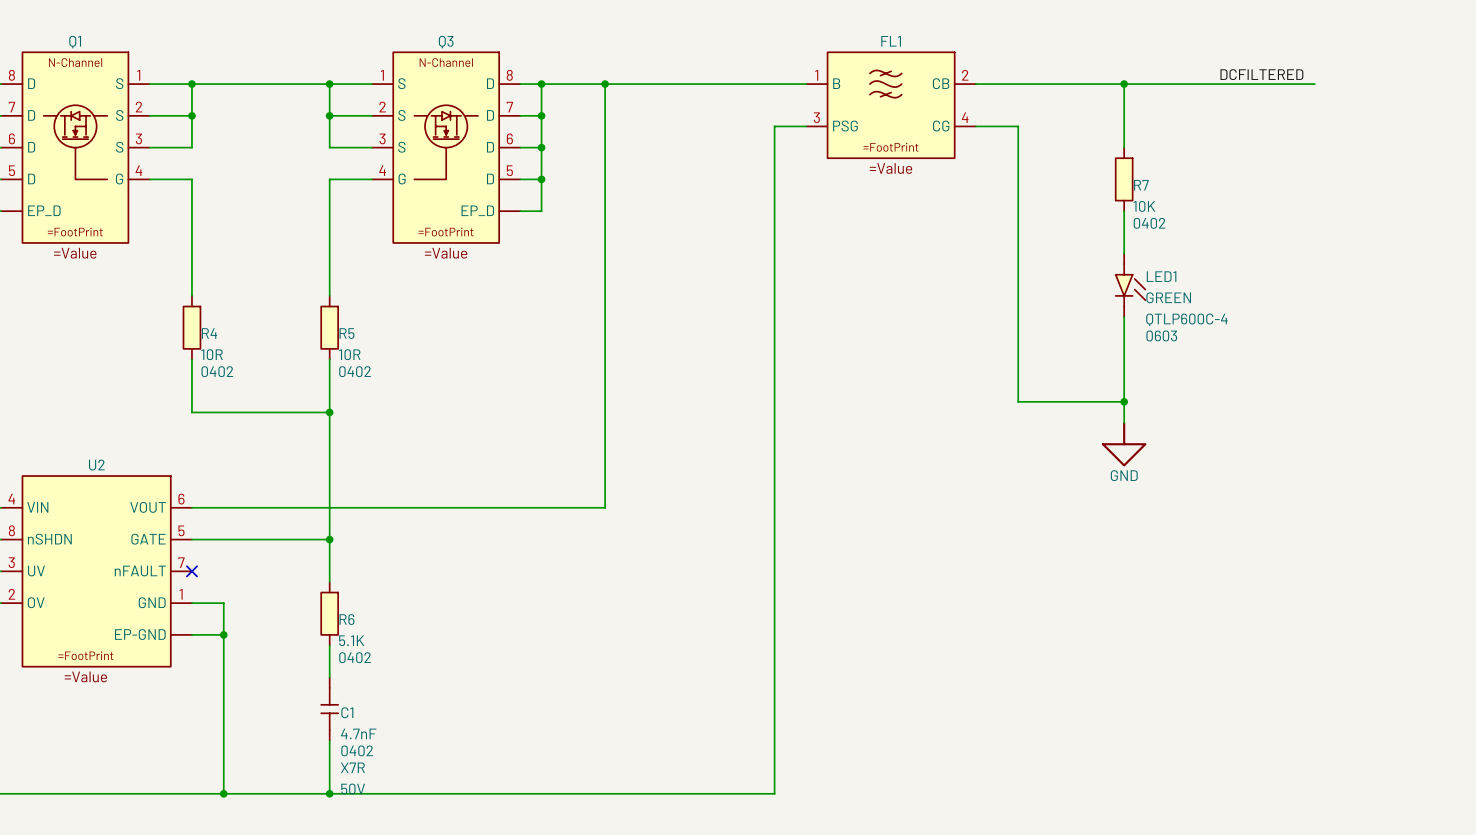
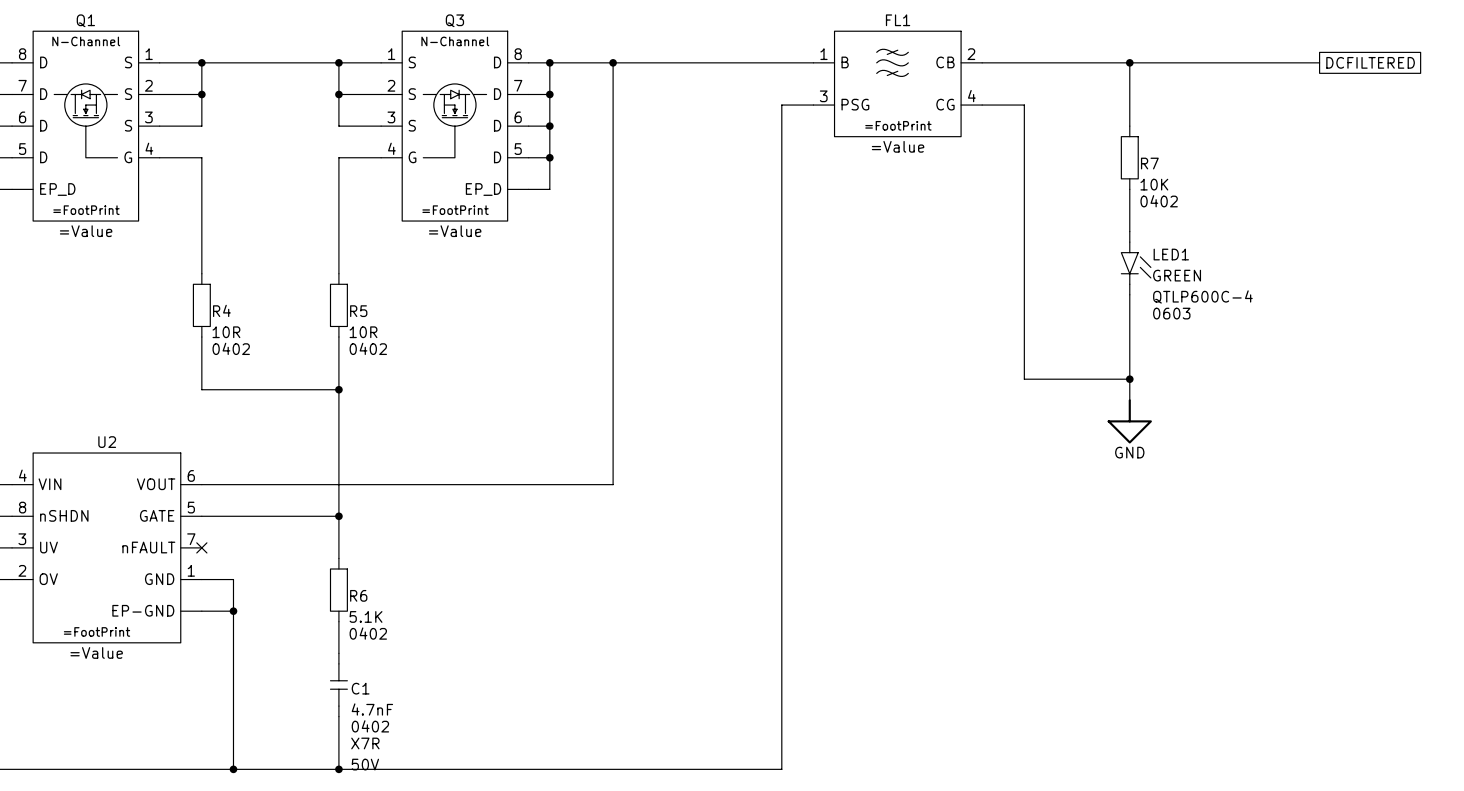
label: DCFILTERED (1261, 74) -> none
global label: none -> DCFILTERED (1370, 62)

